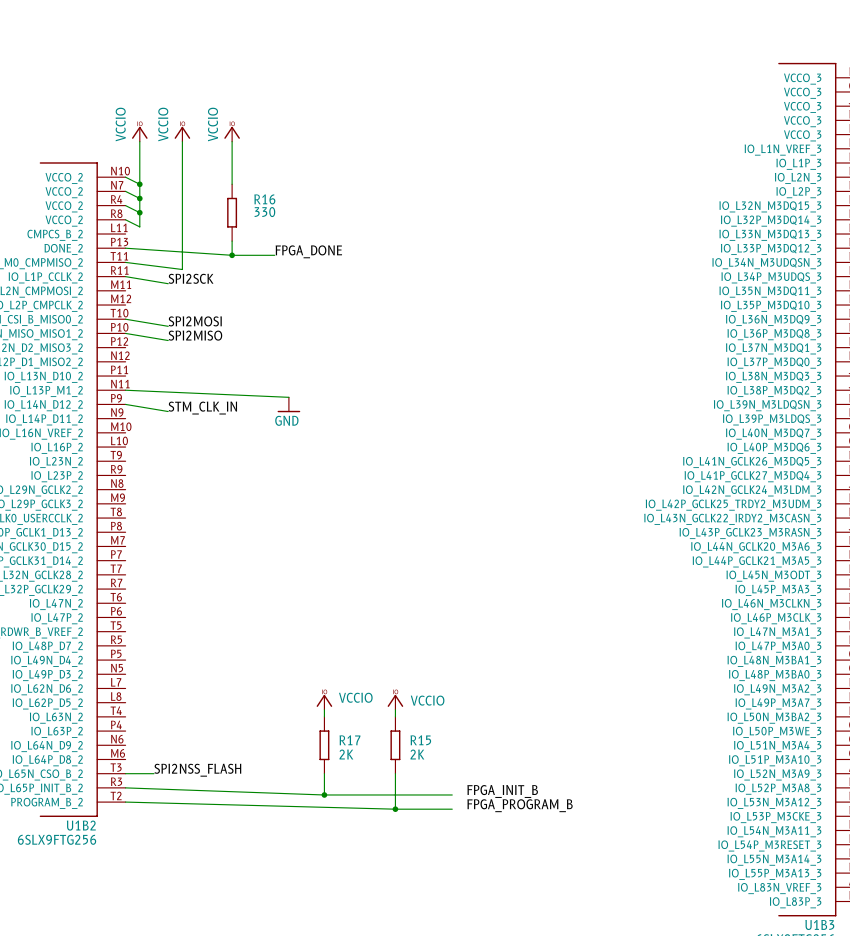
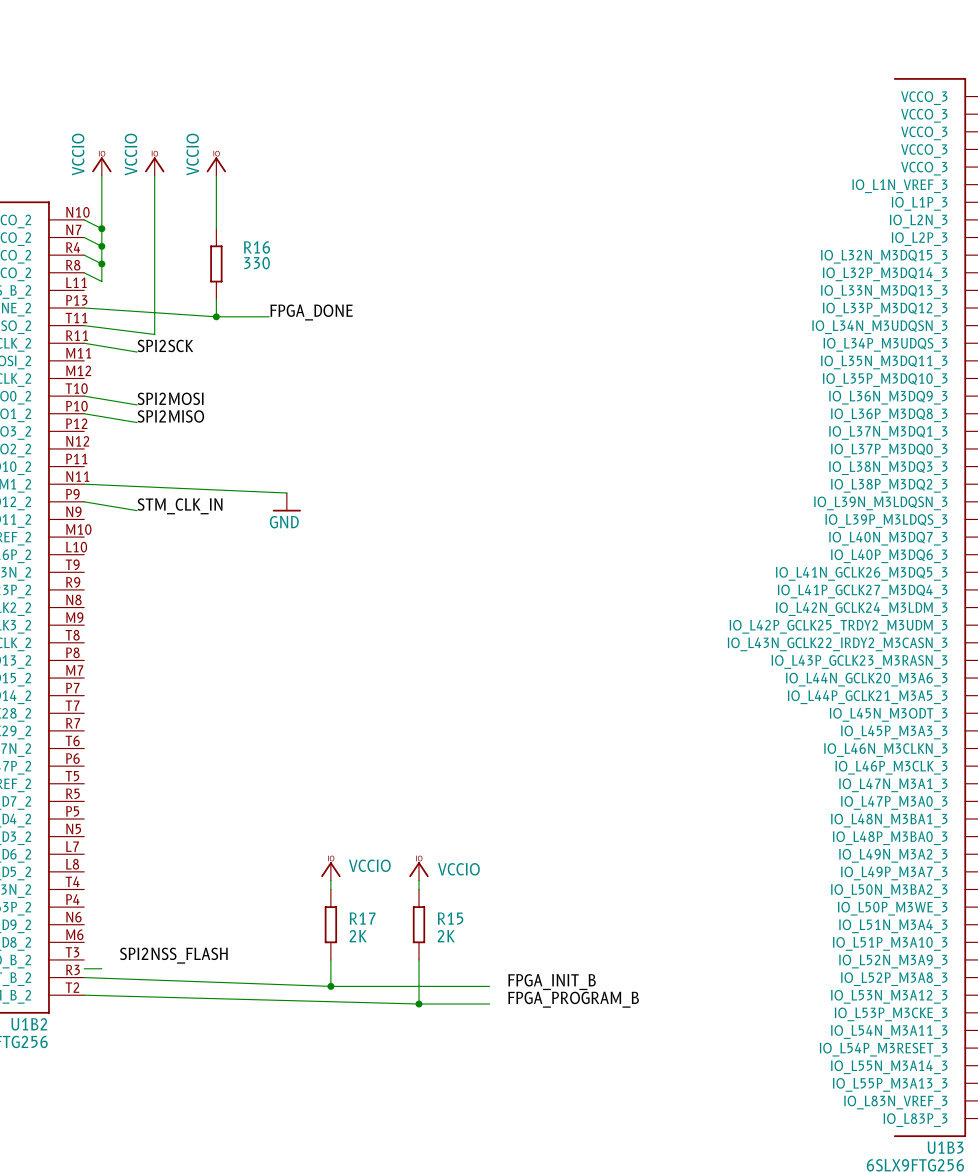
wire: (125, 773) (153, 773) -> none
wire: none -> (84, 968) (101, 968)

